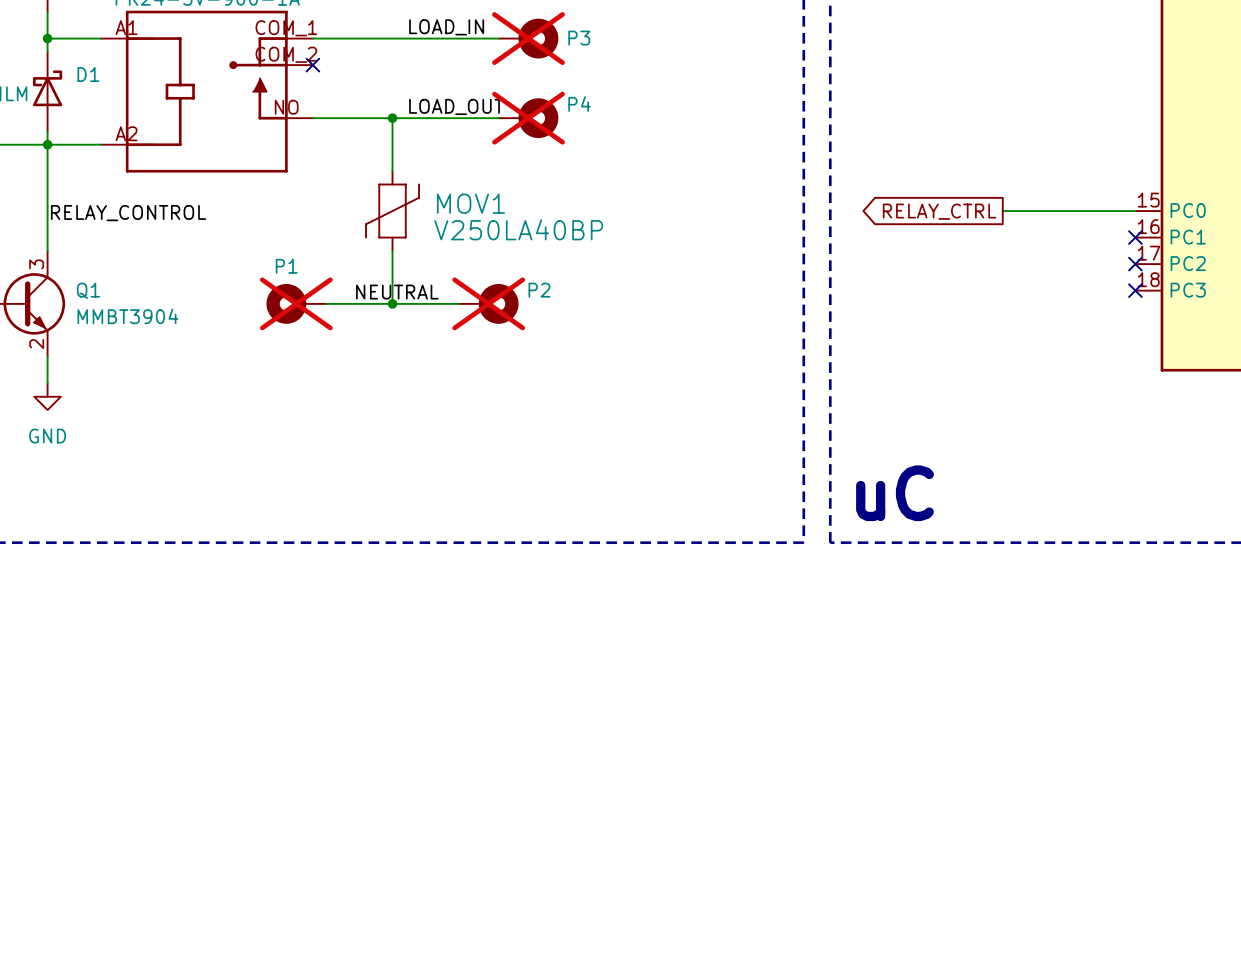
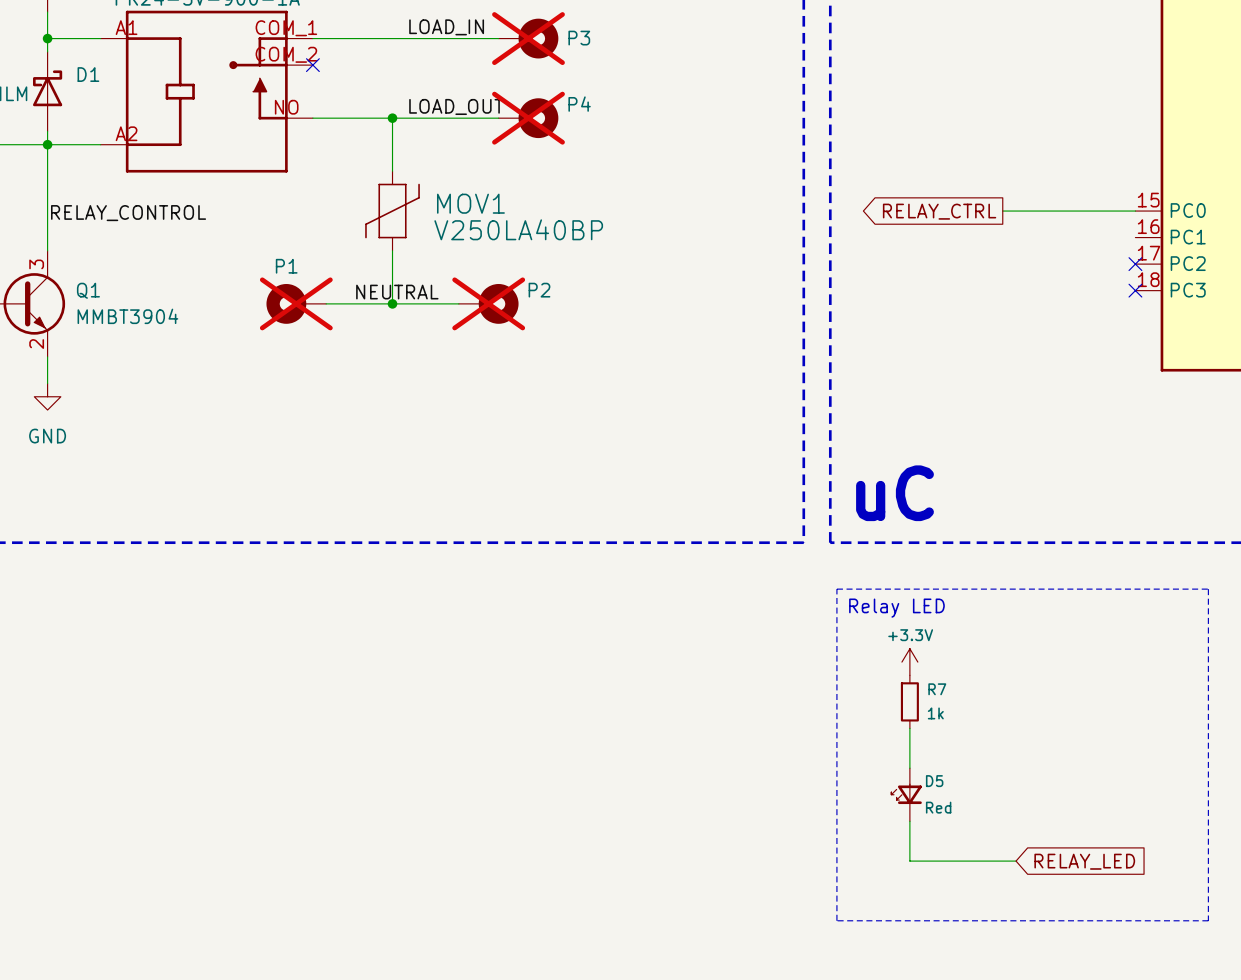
no-connect mark: (1135, 237) -> none
line: none -> (836, 589) (1208, 589) (1208, 920) (836, 920) (836, 589)
text: none -> Relay LED (896, 608)
power symbol: none -> +3.3V (909, 662)
R7: none -> 1k (909, 701)
wire: none -> (909, 728) (909, 768)
D5: none -> Red (906, 794)
wire: none -> (909, 821) (909, 861) (1016, 861)
global label: none -> RELAY_LED (1084, 861)

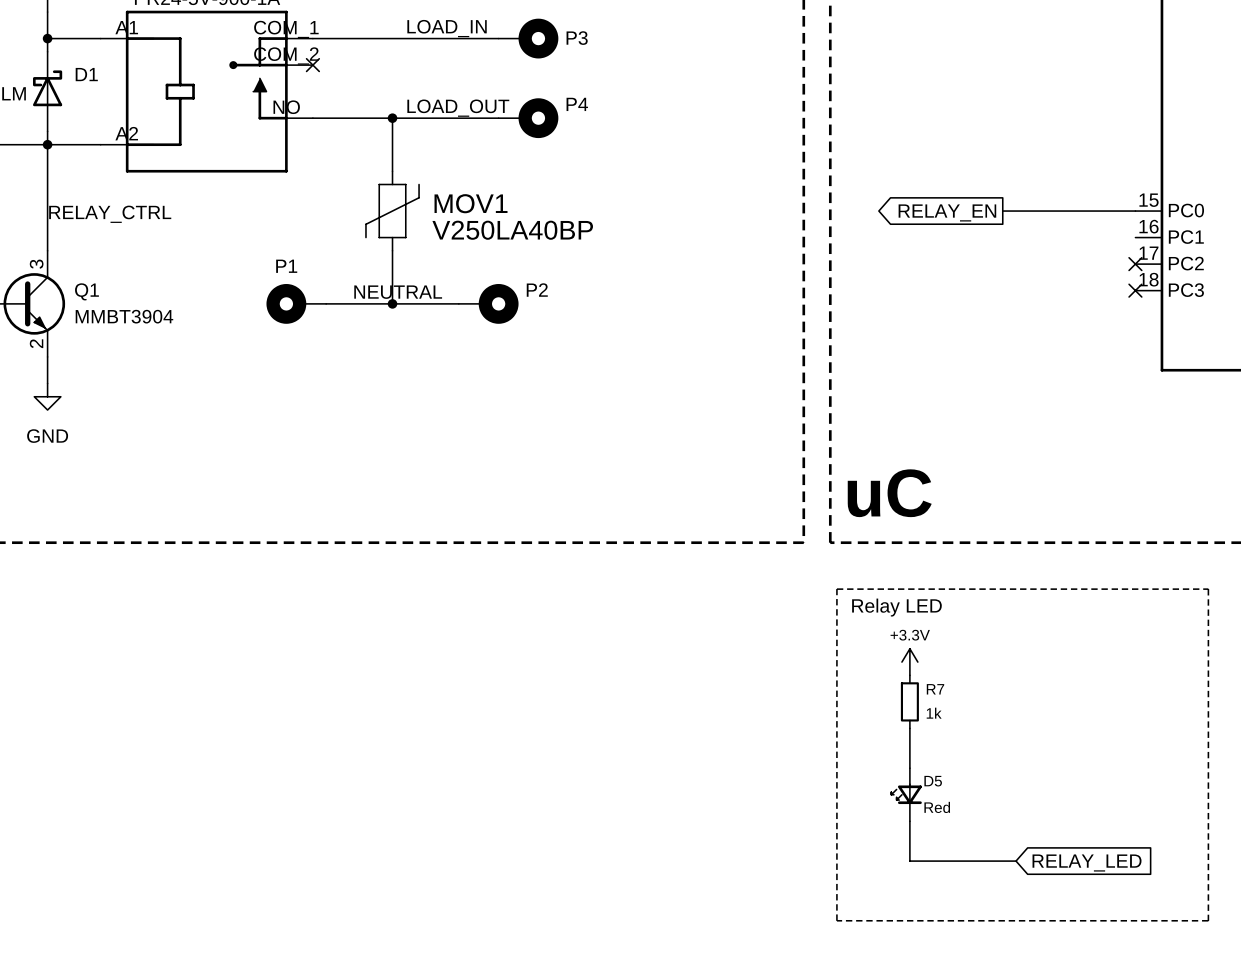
P3 do-not-place cross: (528, 38) -> none
P4 do-not-place cross: (528, 118) -> none
global label: RELAY_CTRL (939, 211) -> RELAY_EN (947, 212)
label: RELAY_CONTROL (128, 213) -> RELAY_CTRL (110, 214)
P1 do-not-place cross: (296, 303) -> none
P2 do-not-place cross: (488, 303) -> none

